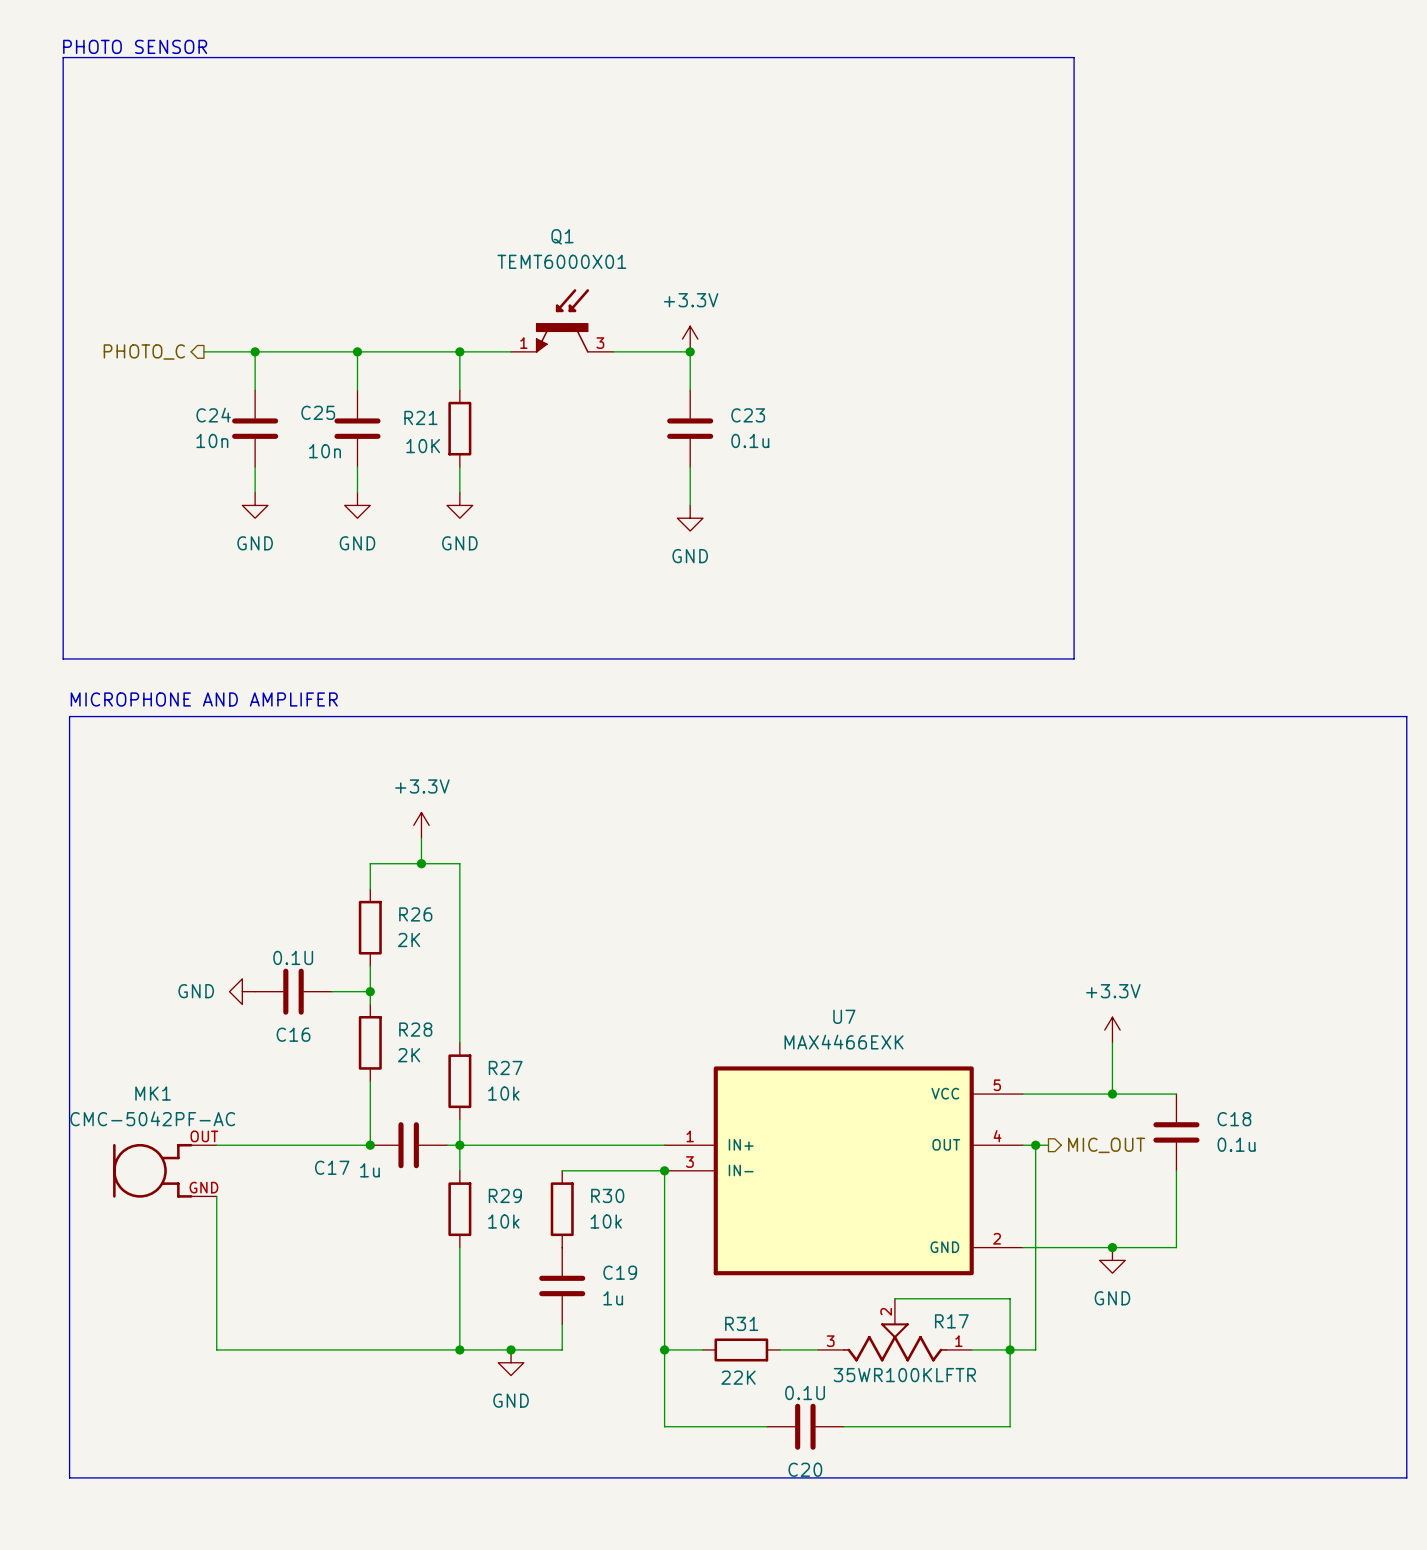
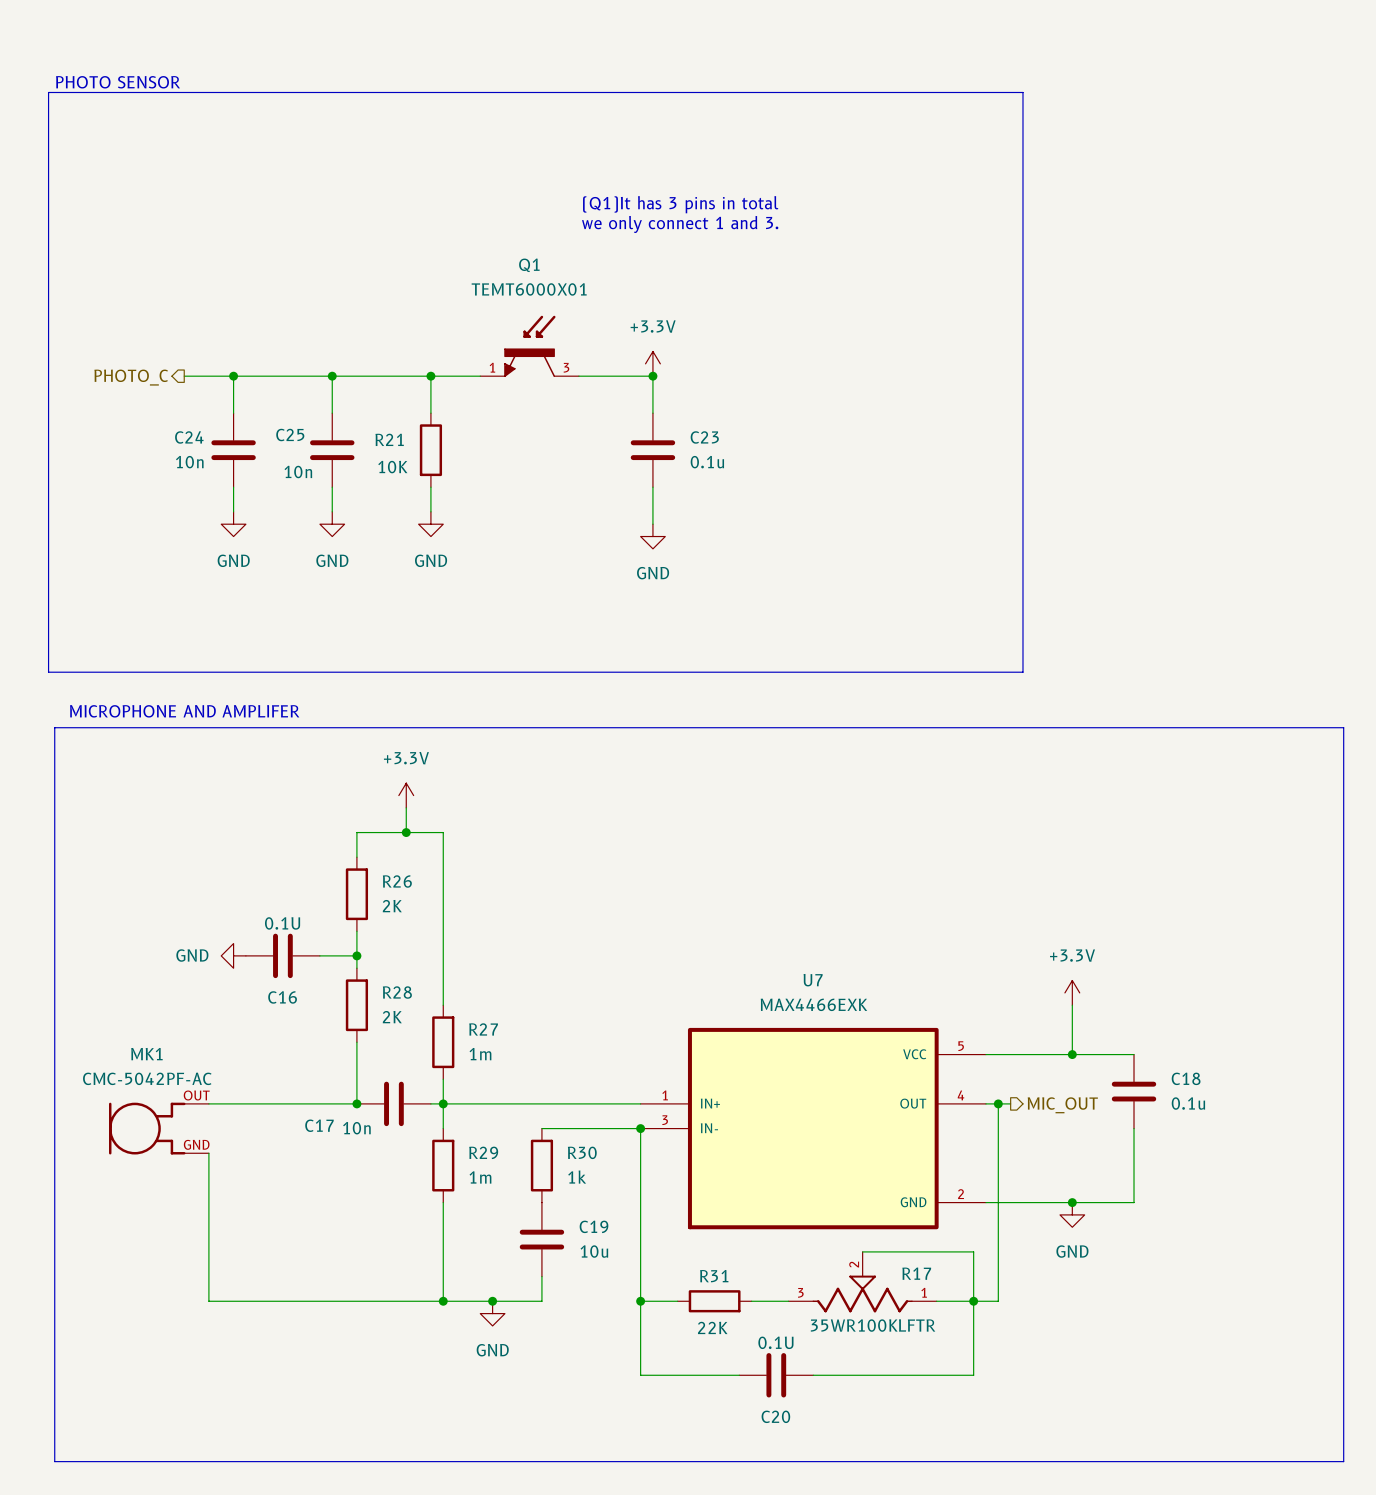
text position: PHOTO SENSOR (135, 46) -> PHOTO SENSOR (117, 82)
line: (63, 57) (1074, 57) (1074, 658) (63, 658) (63, 57) -> (48, 92) (1022, 92) (1022, 672) (48, 672) (48, 92)
text: none -> (Q1)It has 3 pins in total (680, 204)
text: none -> we only connect 1 and 3. (680, 224)
Q1 position: (562, 320) -> (529, 346)
power symbol position: +3.3V (690, 339) -> +3.3V (652, 363)
wire: (203, 351) (511, 351) -> (184, 376) (480, 376)
wire: (255, 351) (255, 390) -> (233, 376) (233, 413)
junction position: (255, 351) -> (233, 376)
wire: (357, 351) (357, 390) -> (332, 376) (332, 413)
junction position: (357, 351) -> (332, 376)
wire: (459, 351) (459, 390) -> (430, 376) (430, 413)
junction position: (459, 351) -> (430, 376)
wire: (613, 351) (690, 351) (690, 390) -> (578, 376) (652, 376) (652, 413)
junction position: (690, 351) -> (652, 376)
hierarchical label position: PHOTO_C (144, 352) -> PHOTO_C (131, 377)
C24 position: (255, 428) -> (233, 450)
C25 position: (357, 428) -> (332, 450)
R21 position: (459, 428) -> (430, 450)
C23 position: (690, 428) -> (652, 450)
wire: (255, 467) (255, 492) -> (233, 487) (233, 511)
wire: (357, 467) (357, 492) -> (332, 487) (332, 511)
wire: (459, 467) (459, 492) -> (430, 487) (430, 511)
wire: (690, 467) (690, 505) -> (652, 487) (652, 524)
power symbol position: GND (255, 505) -> GND (233, 524)
power symbol position: GND (357, 505) -> GND (332, 524)
power symbol position: GND (459, 505) -> GND (430, 524)
power symbol position: GND (690, 518) -> GND (652, 536)
text position: MICROPHONE AND AMPLIFER (204, 699) -> MICROPHONE AND AMPLIFER (184, 711)
line: (69, 716) (1406, 716) (1406, 1477) (69, 1477) (69, 716) -> (54, 727) (1343, 727) (1343, 1461) (54, 1461) (54, 727)
R27 value: 10k (503, 1093) -> 1m (480, 1054)
C17 value: 1u (369, 1170) -> 10n (356, 1128)
R29 value: 10k (503, 1221) -> 1m (480, 1177)
R30 value: 10k (606, 1221) -> 1k (577, 1177)
C19 value: 1u (613, 1298) -> 10u (594, 1251)

